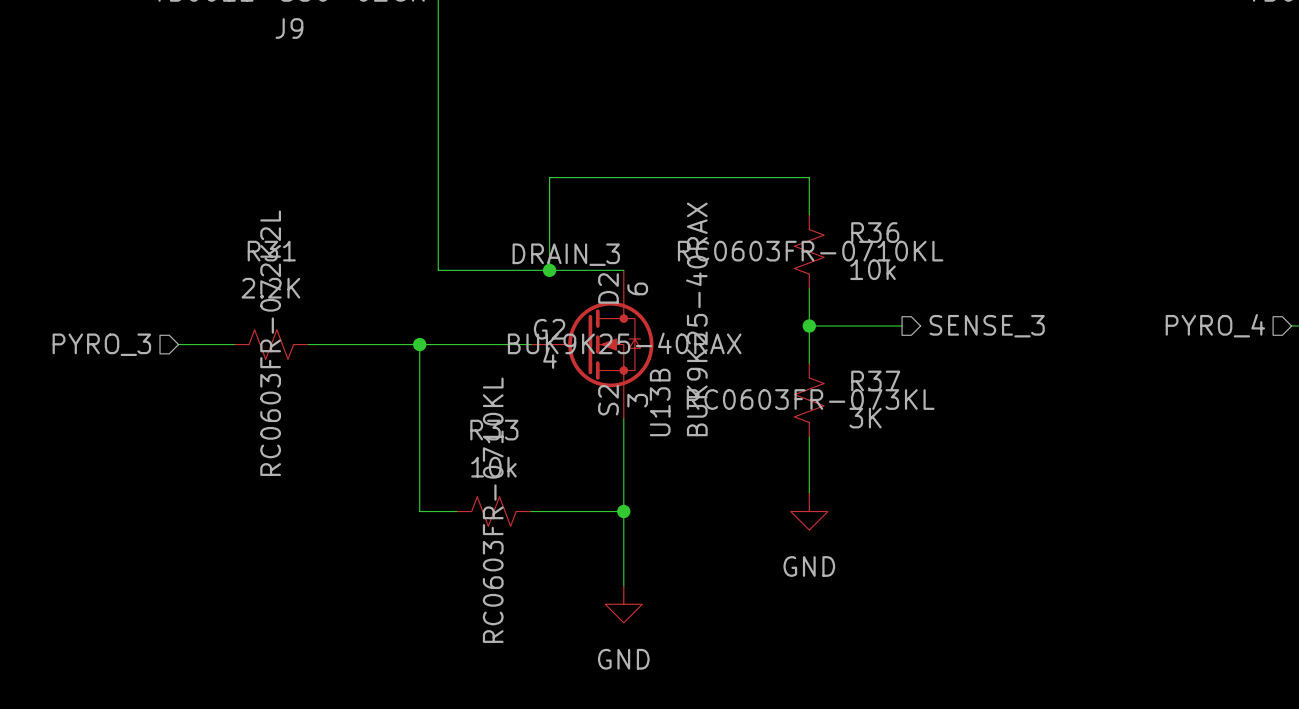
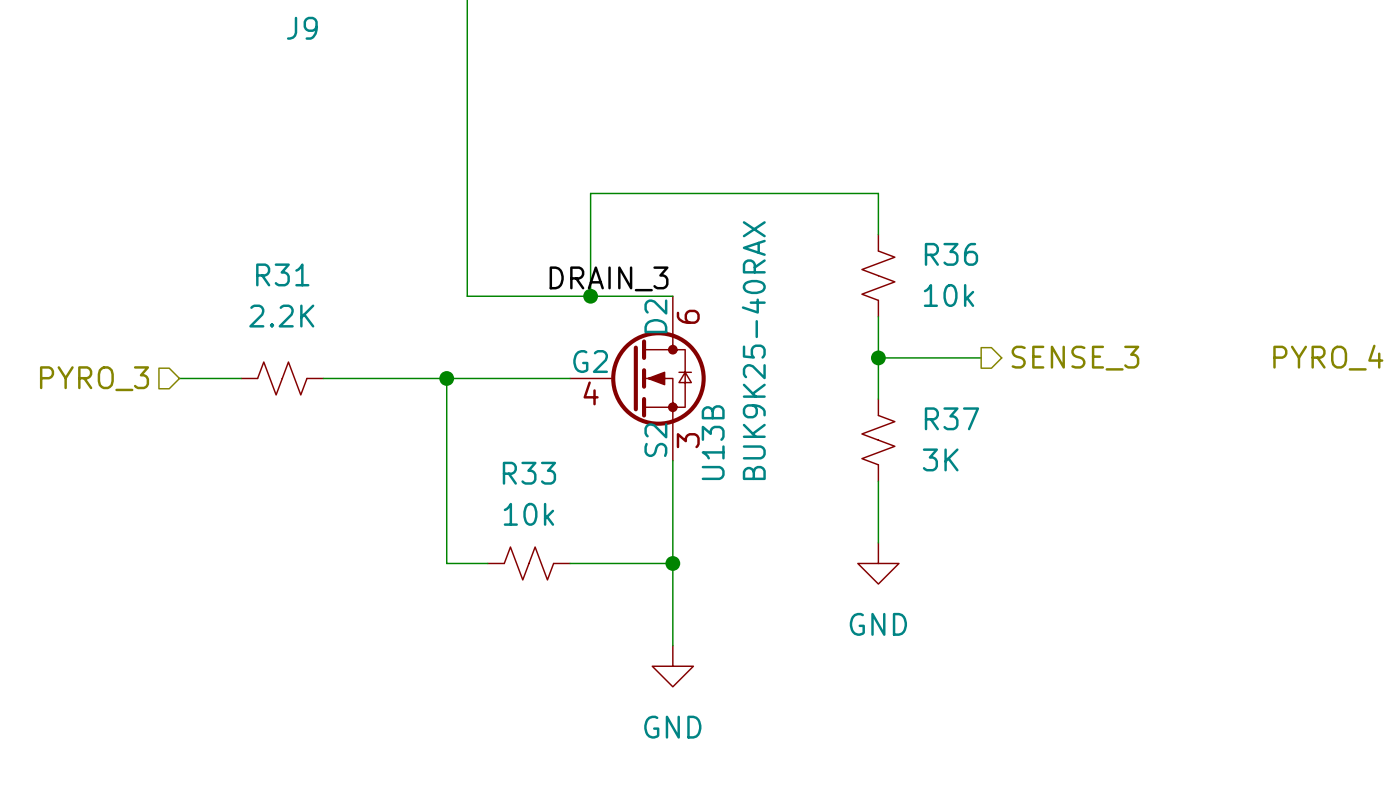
R36 text: RC0603FR-0710KL (810, 251) -> none
R31 text: RC0603FR-072K2L (270, 343) -> none
U13B text: BUK9K25-40RAX (624, 343) -> none
R37 text: RC0603FR-073KL (810, 399) -> none
R33 text: RC0603FR-0710KL (493, 510) -> none

